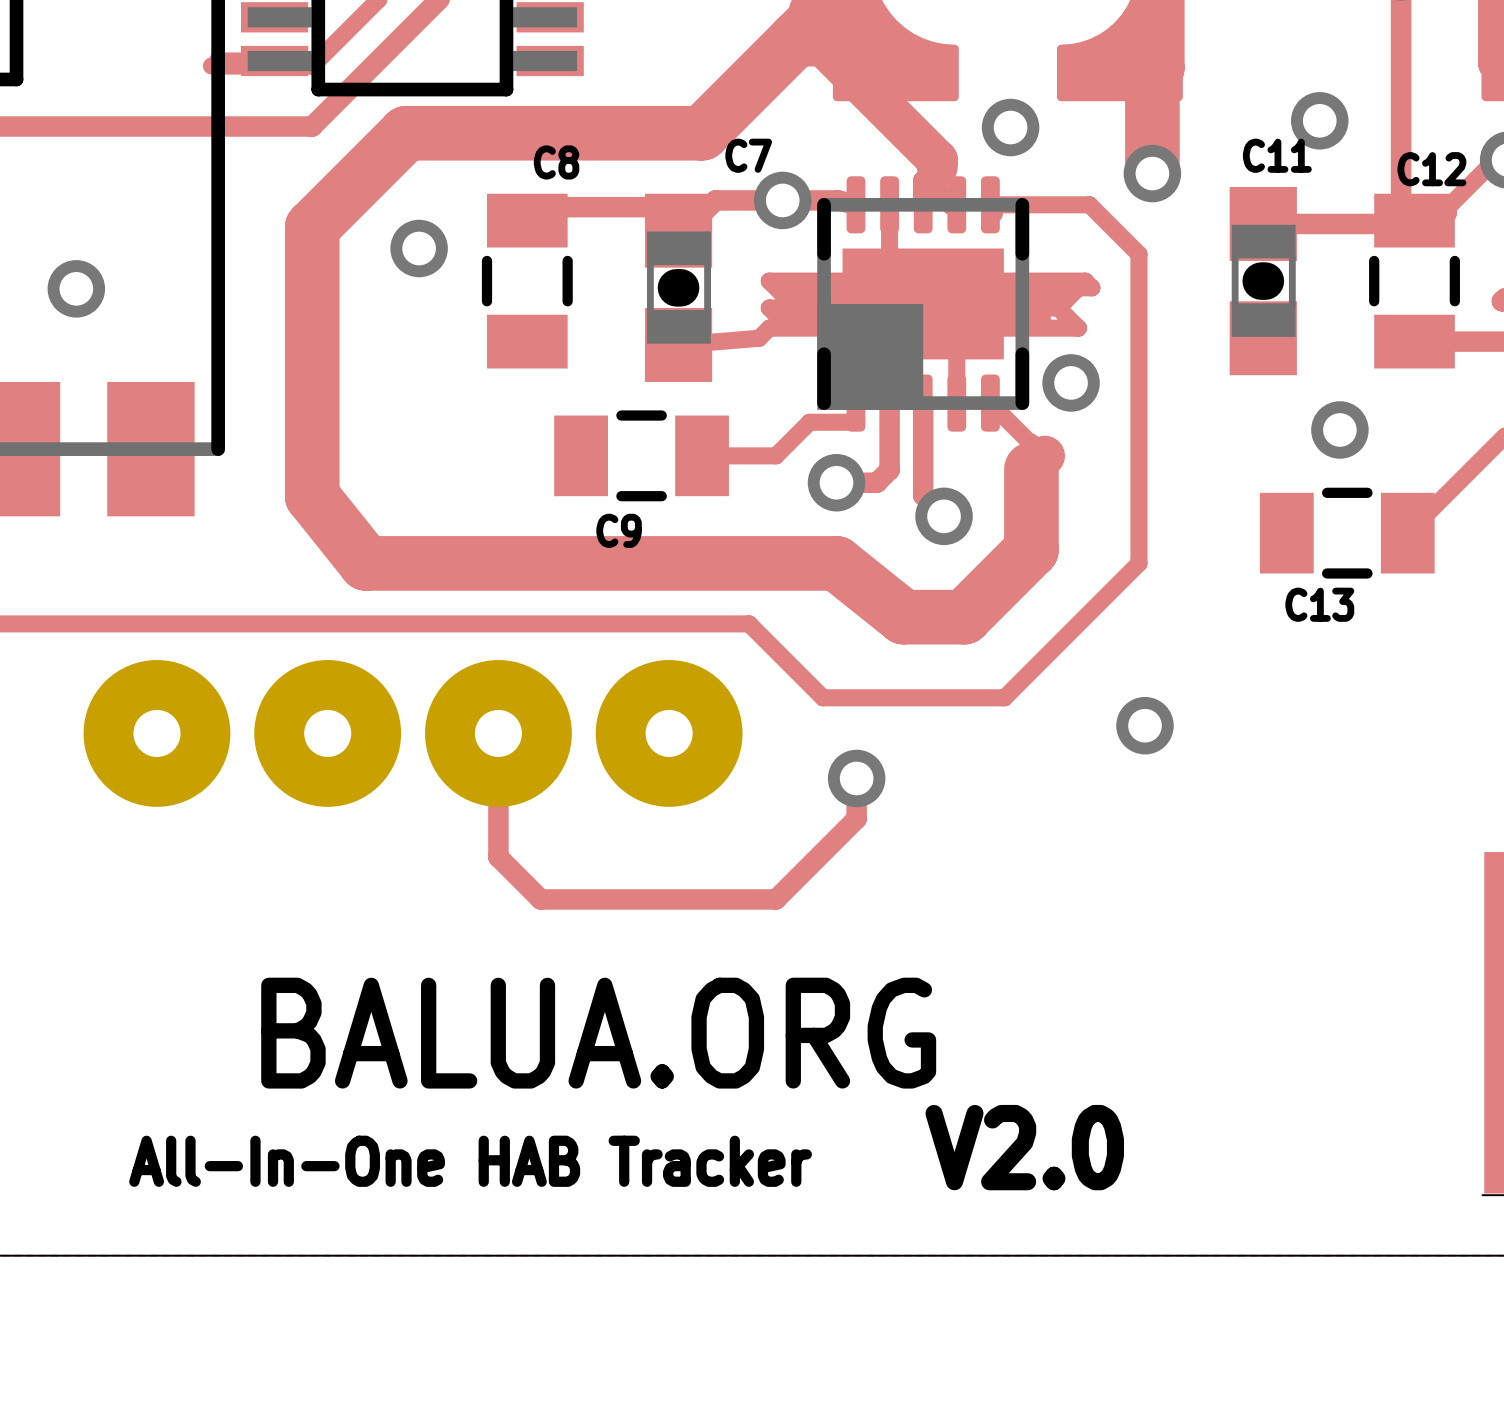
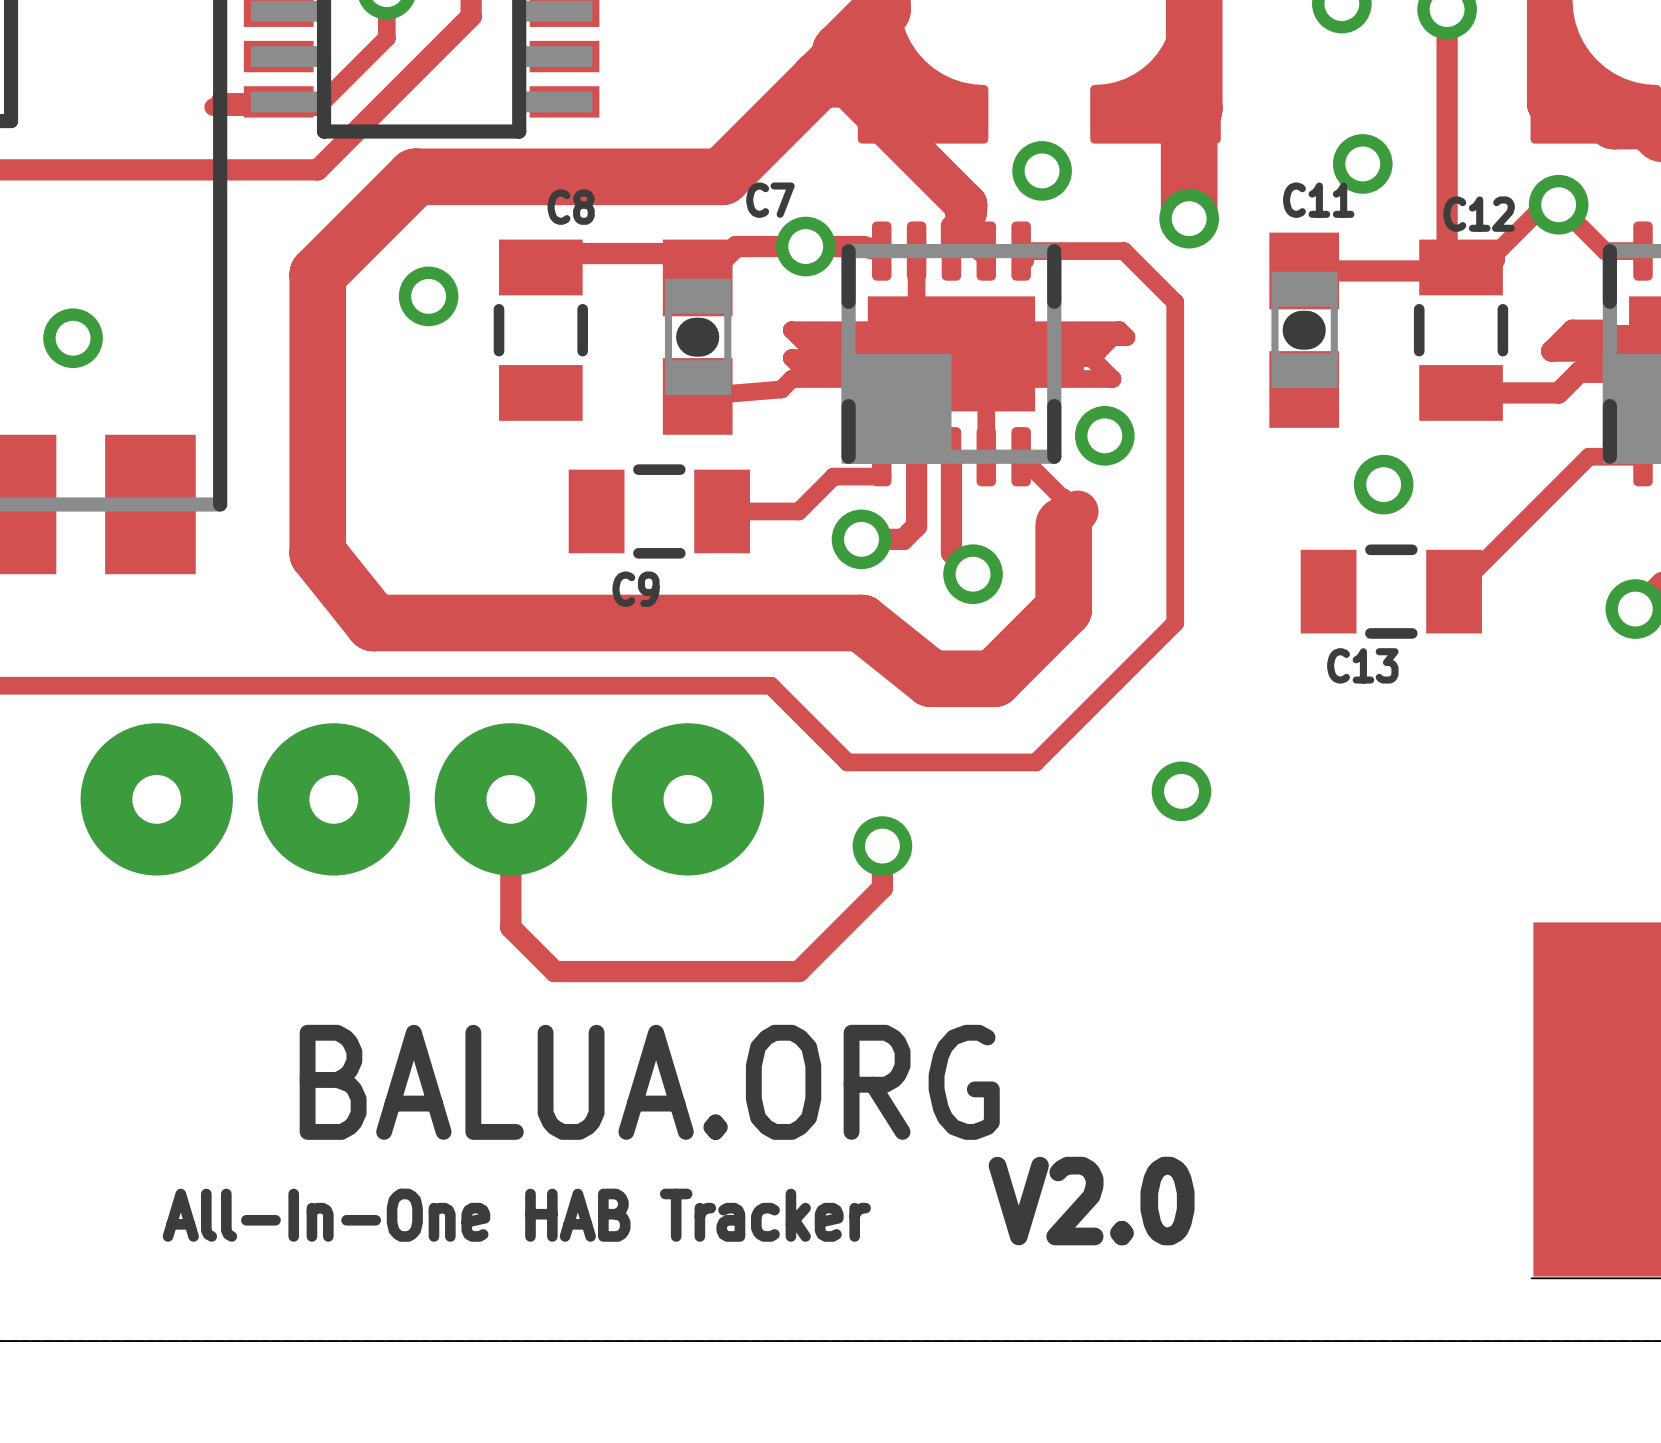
text position: BALUA.ORG (598, 1033) -> BALUA.ORG (649, 1082)
text position: V2.0 (1024, 1147) -> V2.0 (1091, 1201)
text position: All-In-One HAB Tracker (470, 1161) -> All-In-One HAB Tracker (516, 1215)

